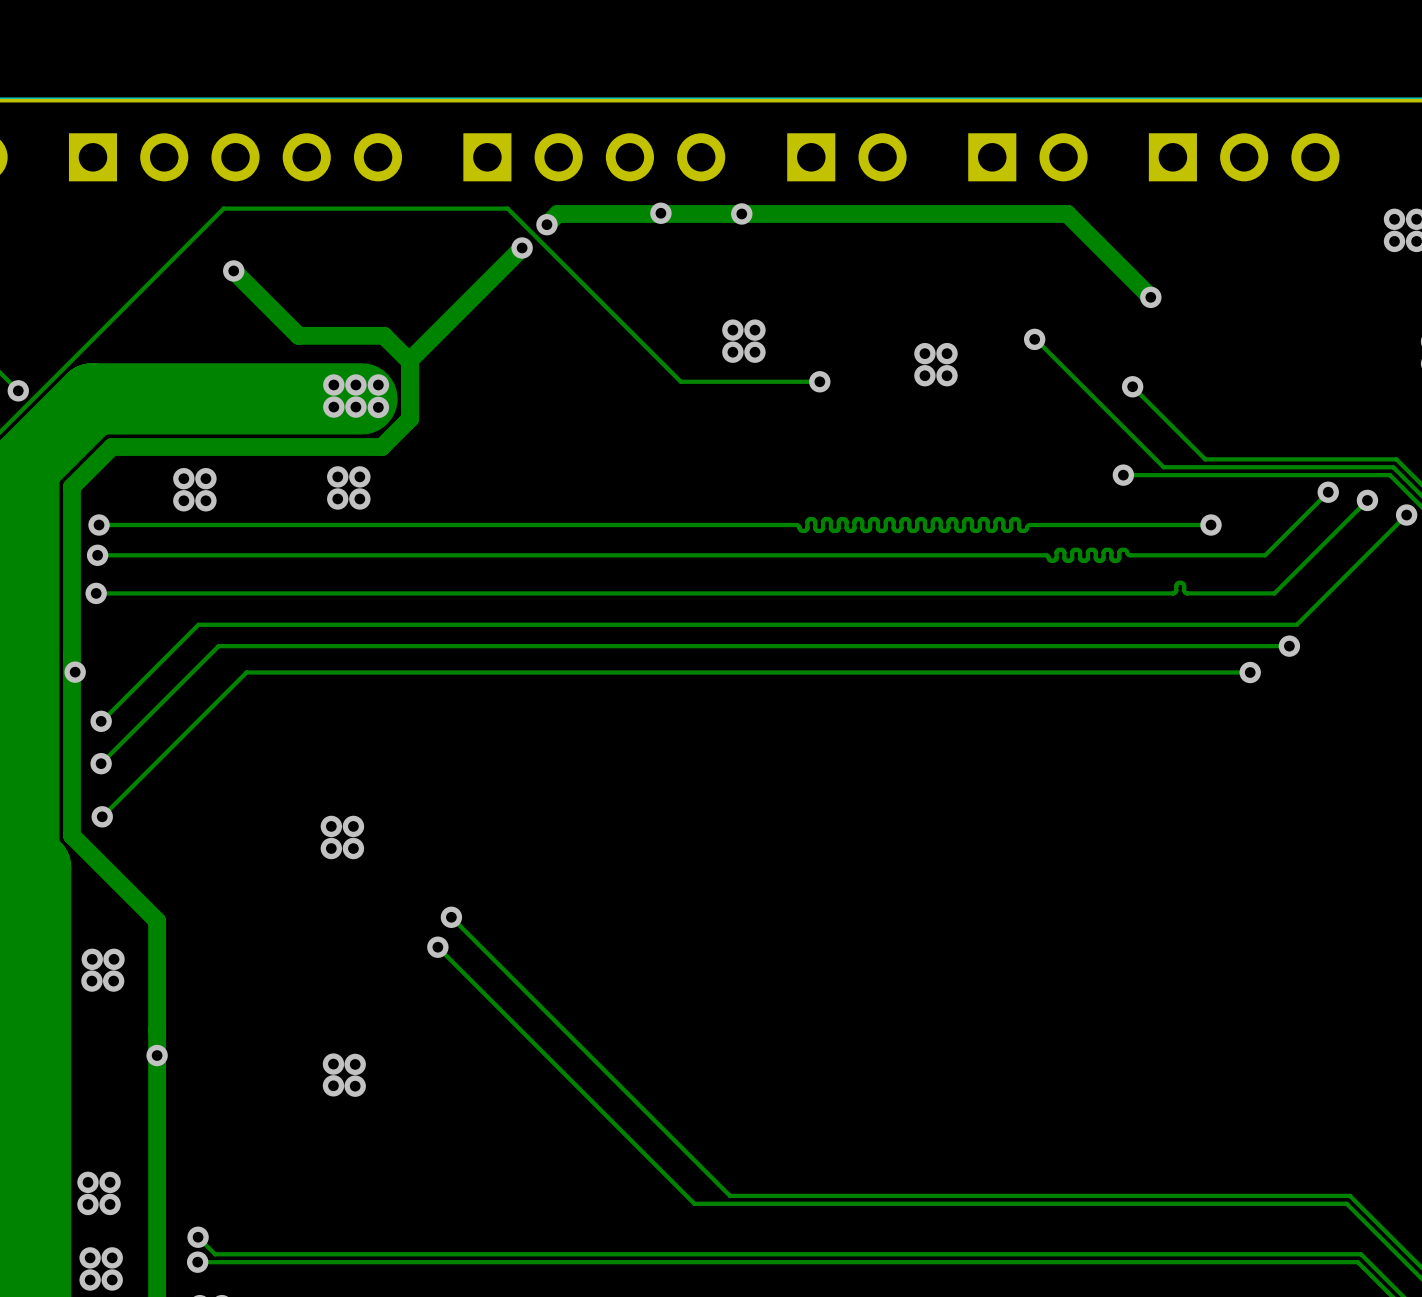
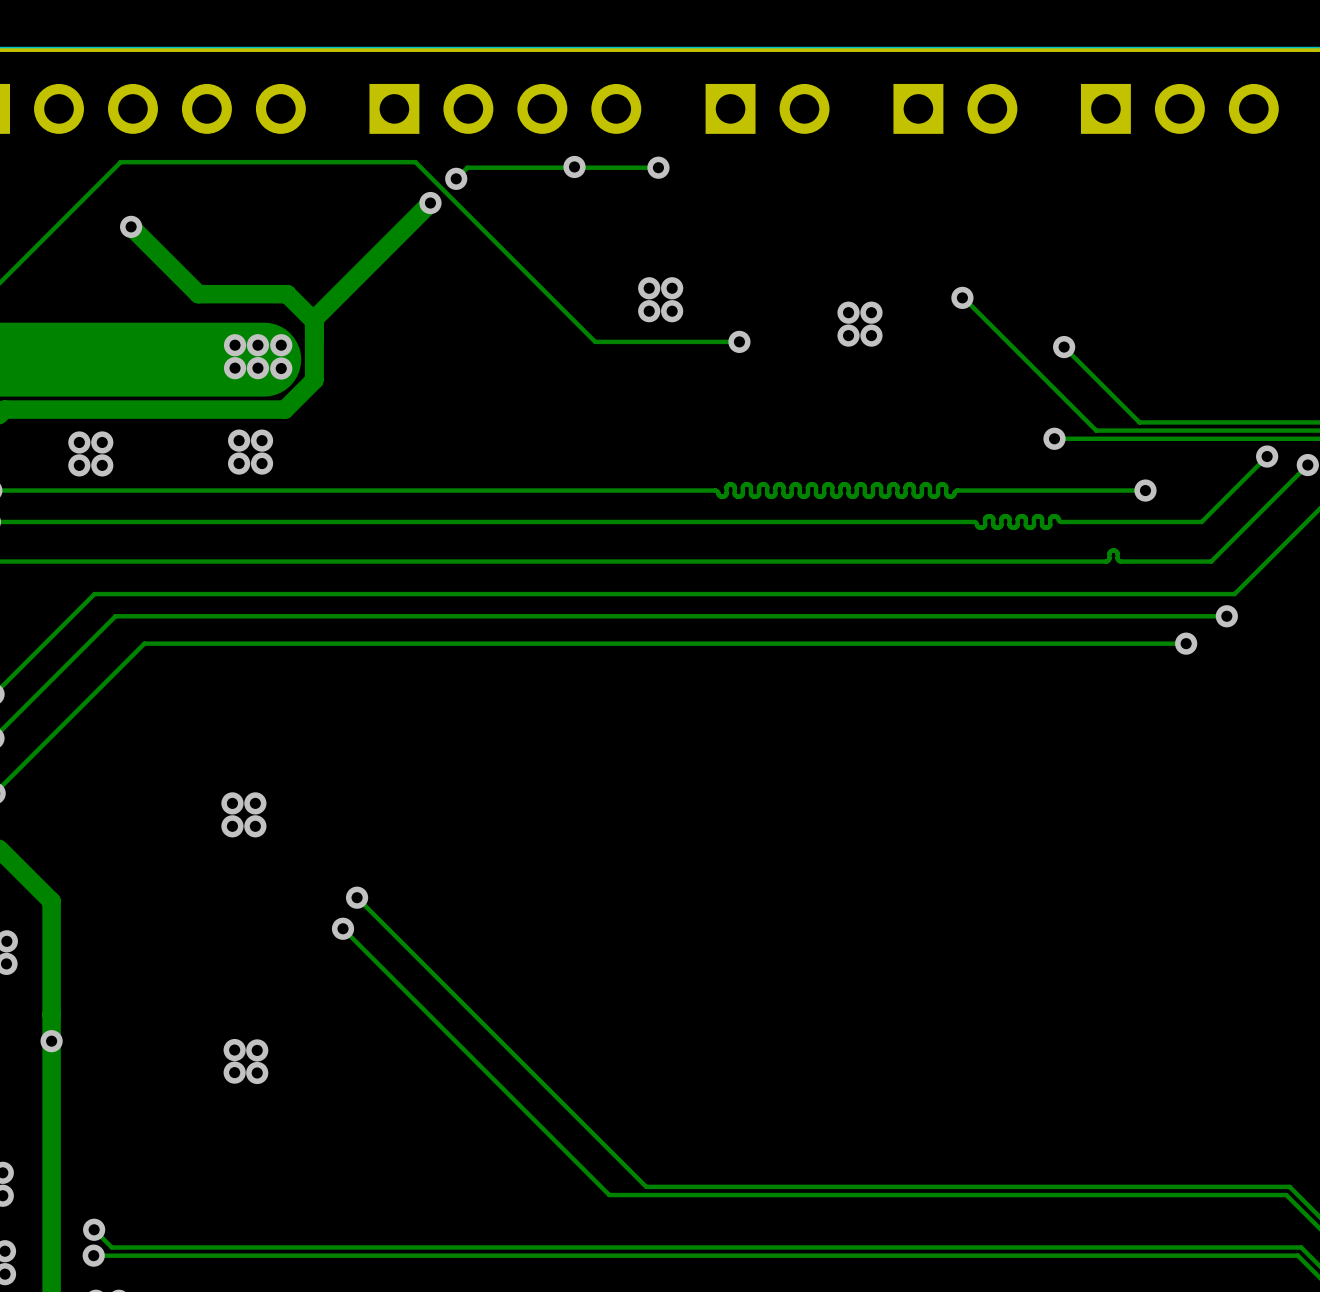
track: (741, 213) (1067, 213) (1150, 297) -> none
track width: thick (741, 213) (557, 213) (546, 224) -> thin (658, 167) (467, 167) (456, 178)
via: (1150, 297) -> none

